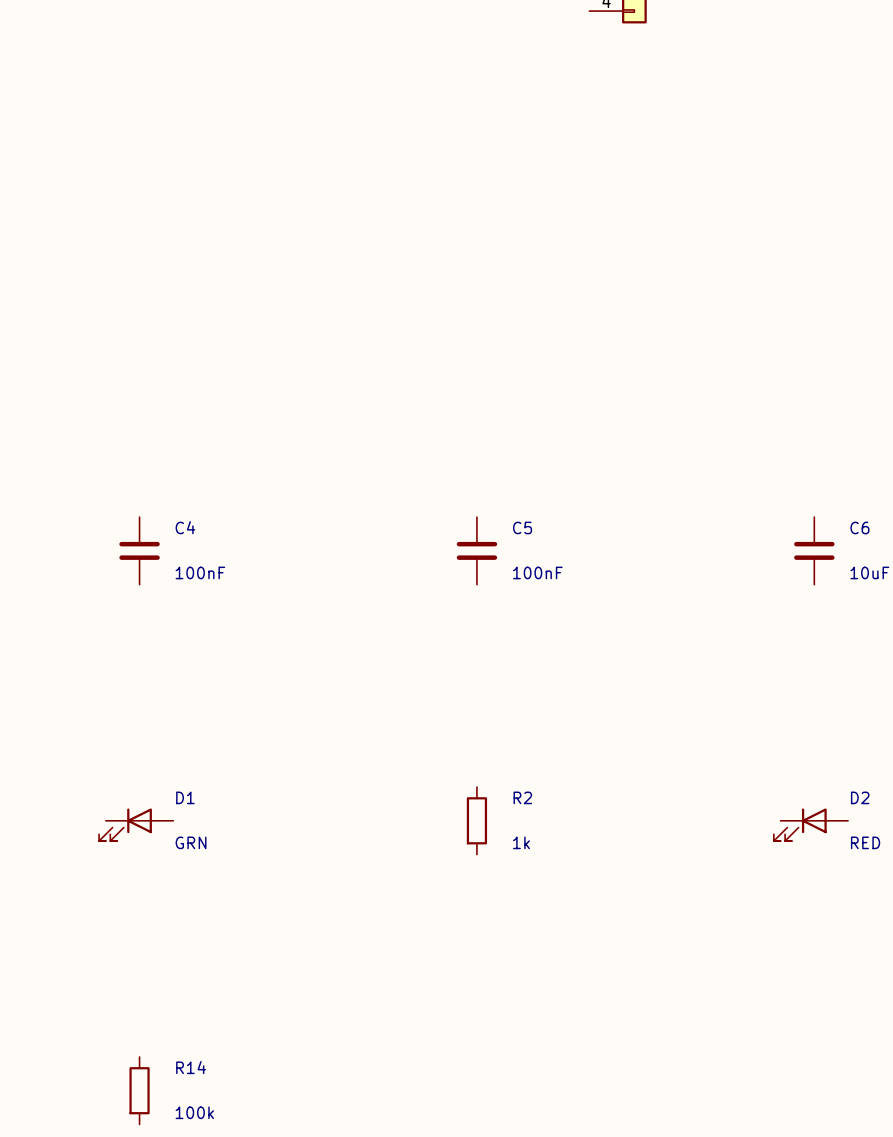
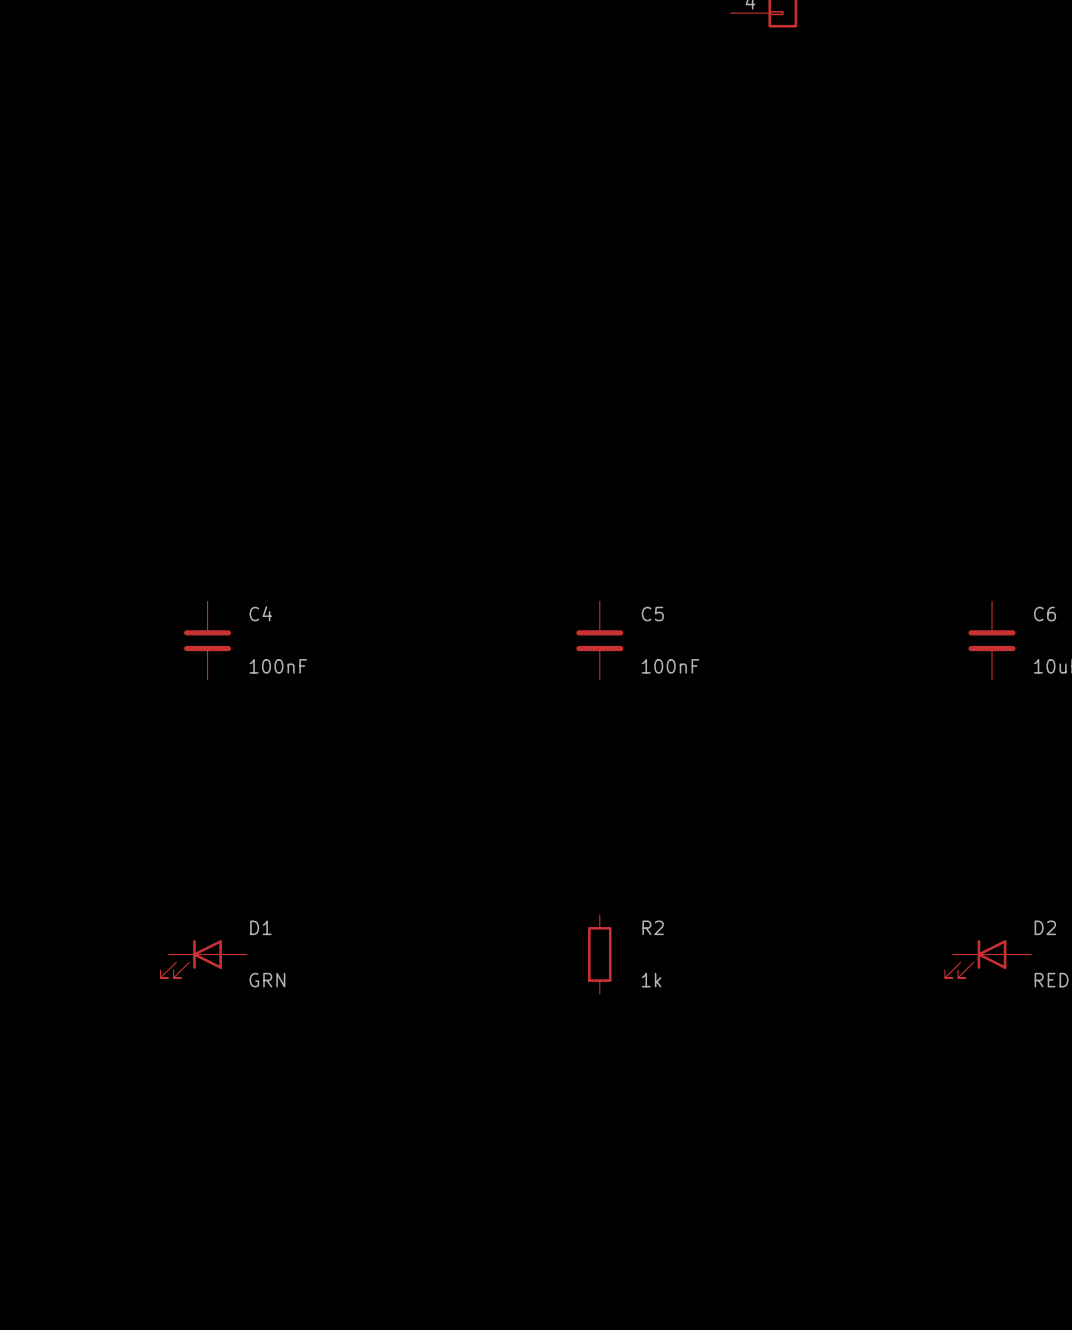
R14: 100k (139, 1090) -> none

